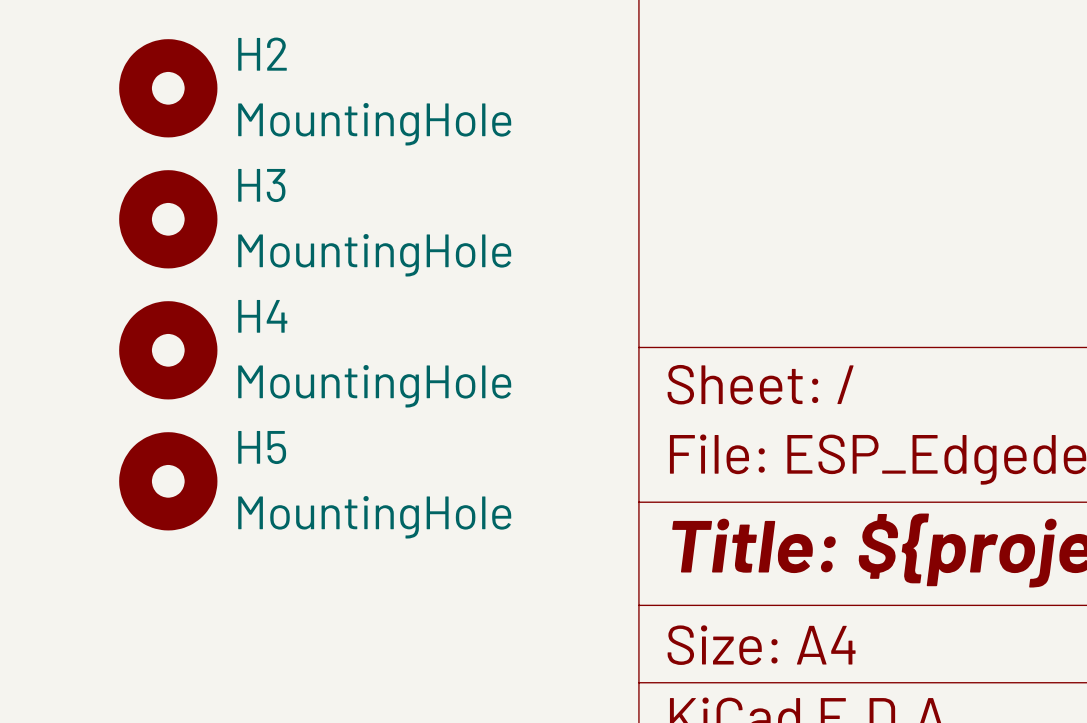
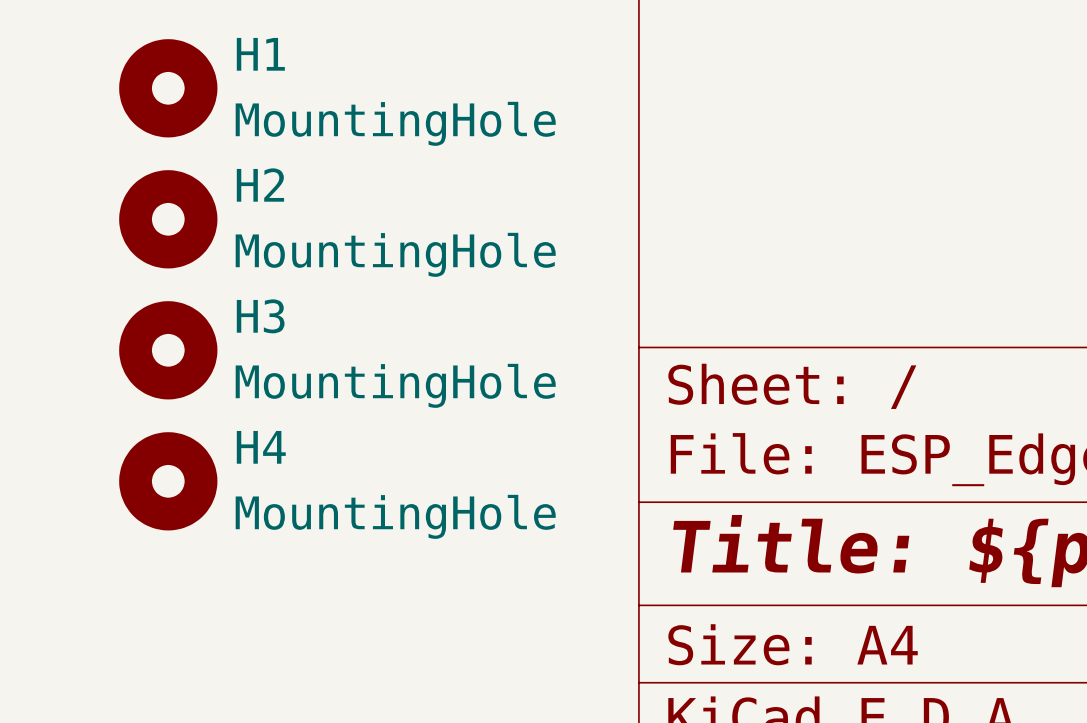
H2 name: H2 (262, 54) -> H1 (260, 54)
H3 name: H3 (261, 185) -> H2 (260, 185)
H4 name: H4 (262, 316) -> H3 (260, 316)
H5 name: H5 (262, 447) -> H4 (261, 447)

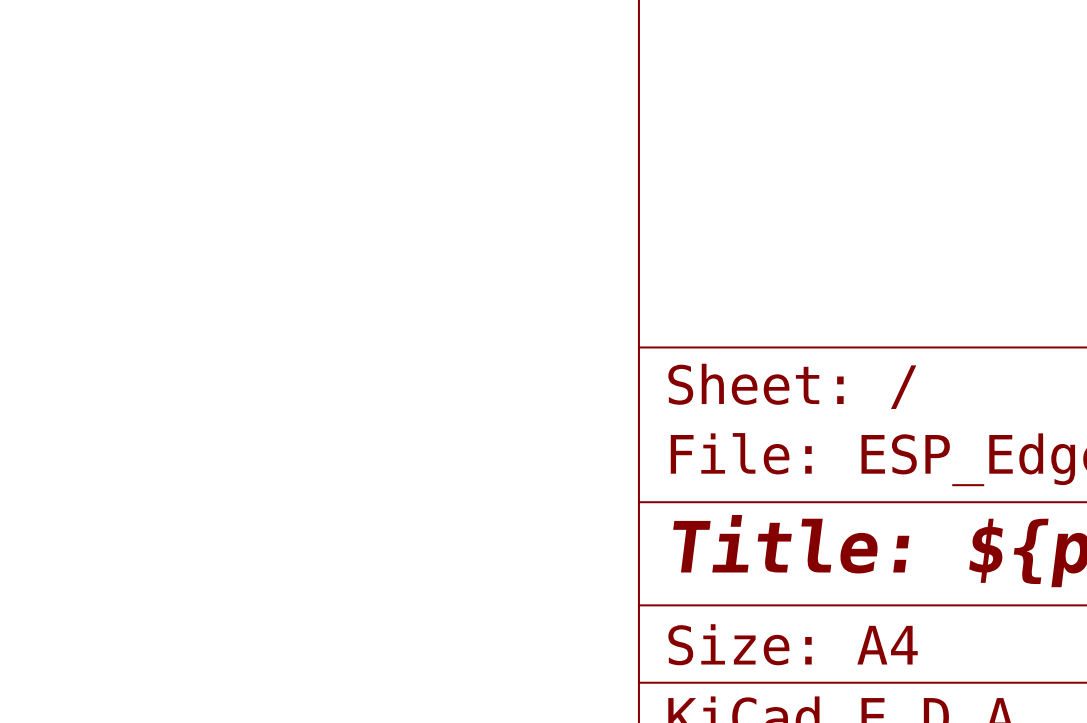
H1: MountingHole (168, 88) -> none
H2: MountingHole (168, 219) -> none
H3: MountingHole (168, 350) -> none
H4: MountingHole (168, 481) -> none

